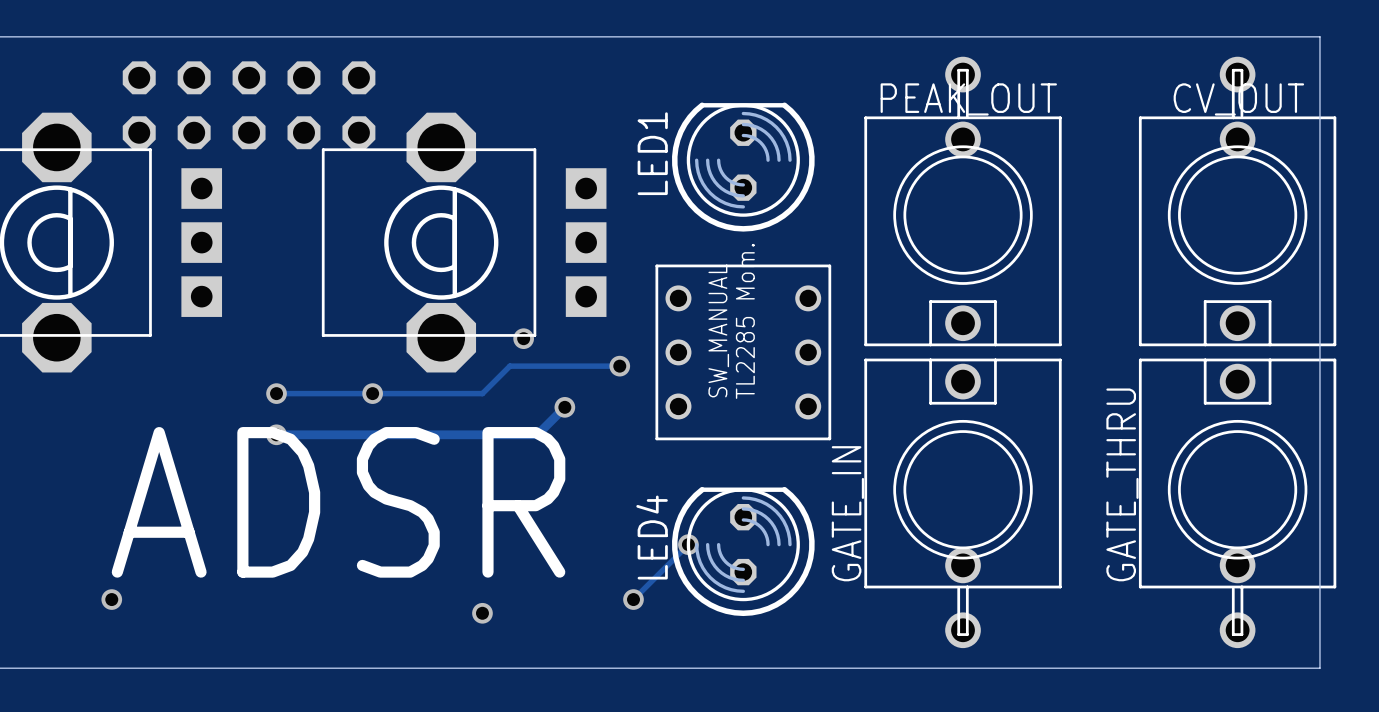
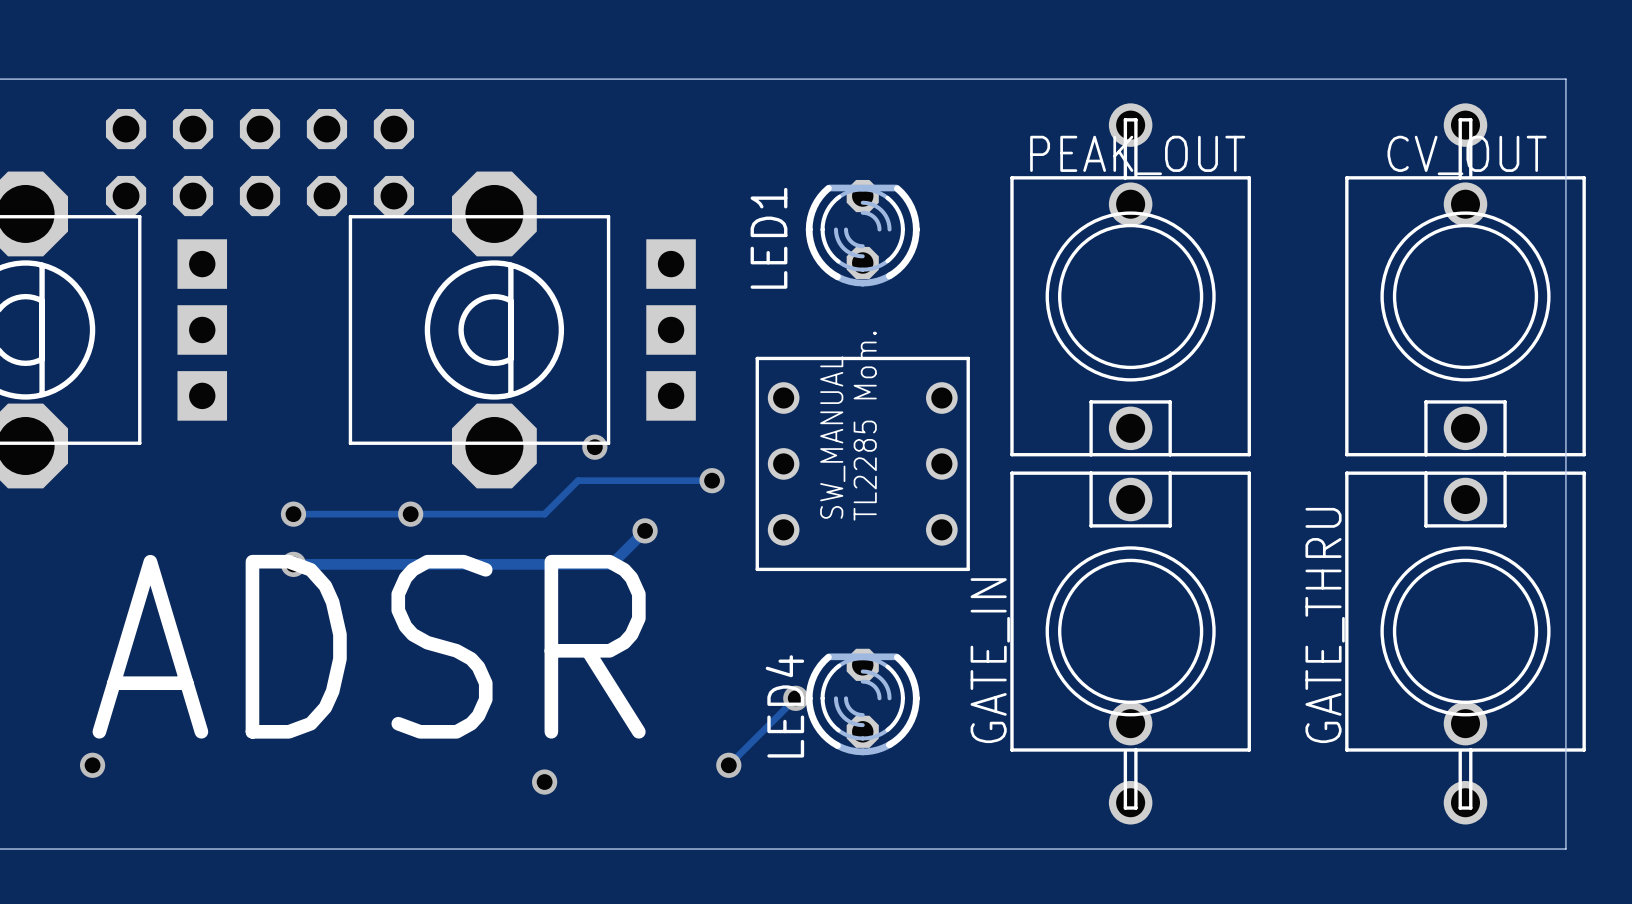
LED1 footprint: [672, 102, 815, 232] -> [805, 179, 920, 287]
LED4 footprint: [672, 486, 815, 617] -> [805, 648, 920, 756]

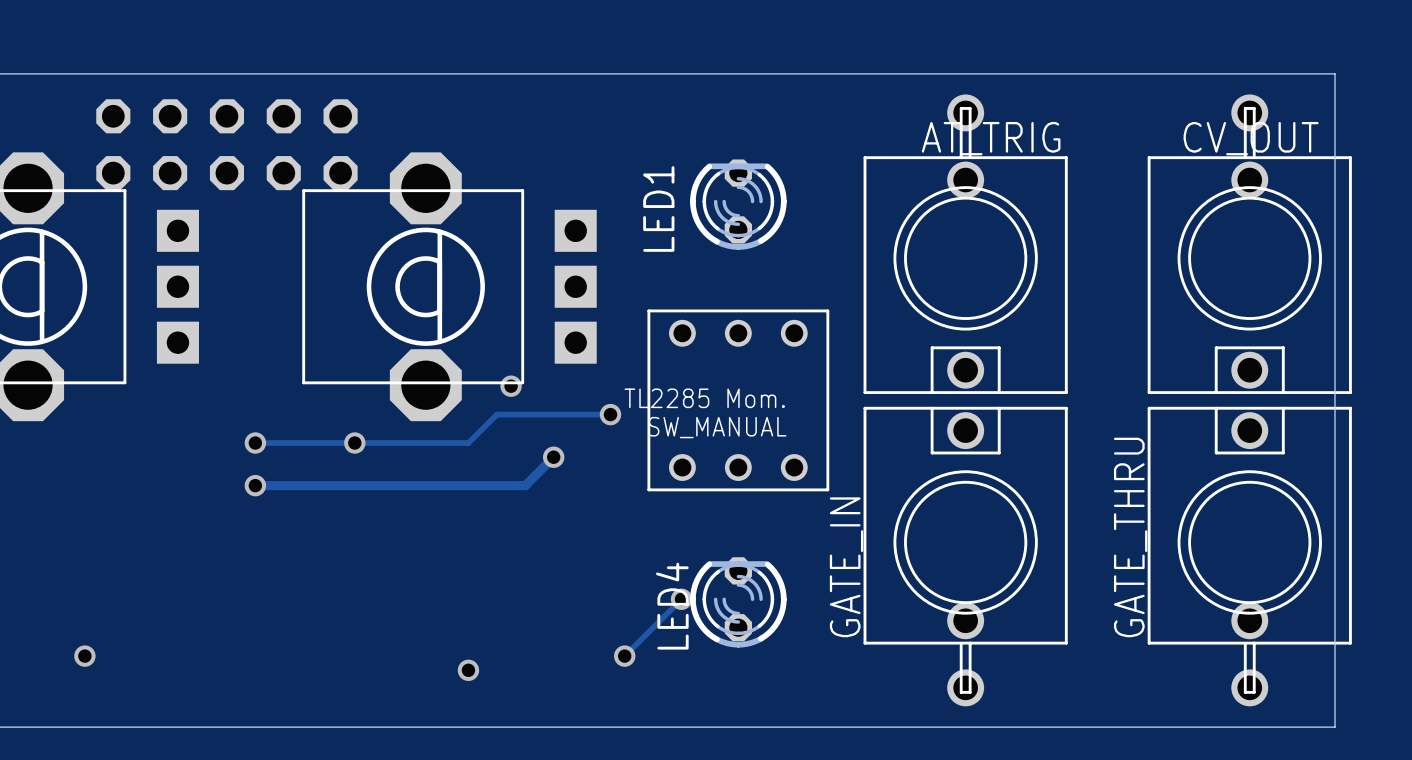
PEAK_OUT name: PEAK_OUT (1137, 155) -> AT_TRIG (991, 138)
SW_MANUAL value position: TL2285 Mom. (865, 426) -> TL2285 Mom. (704, 398)
SW_MANUAL name position: SW_MANUAL (832, 437) -> SW_MANUAL (717, 427)
SW_MANUAL rotation: 0° (862, 463) -> 90° clockwise (738, 400)
text: ADSR (369, 646) -> none

